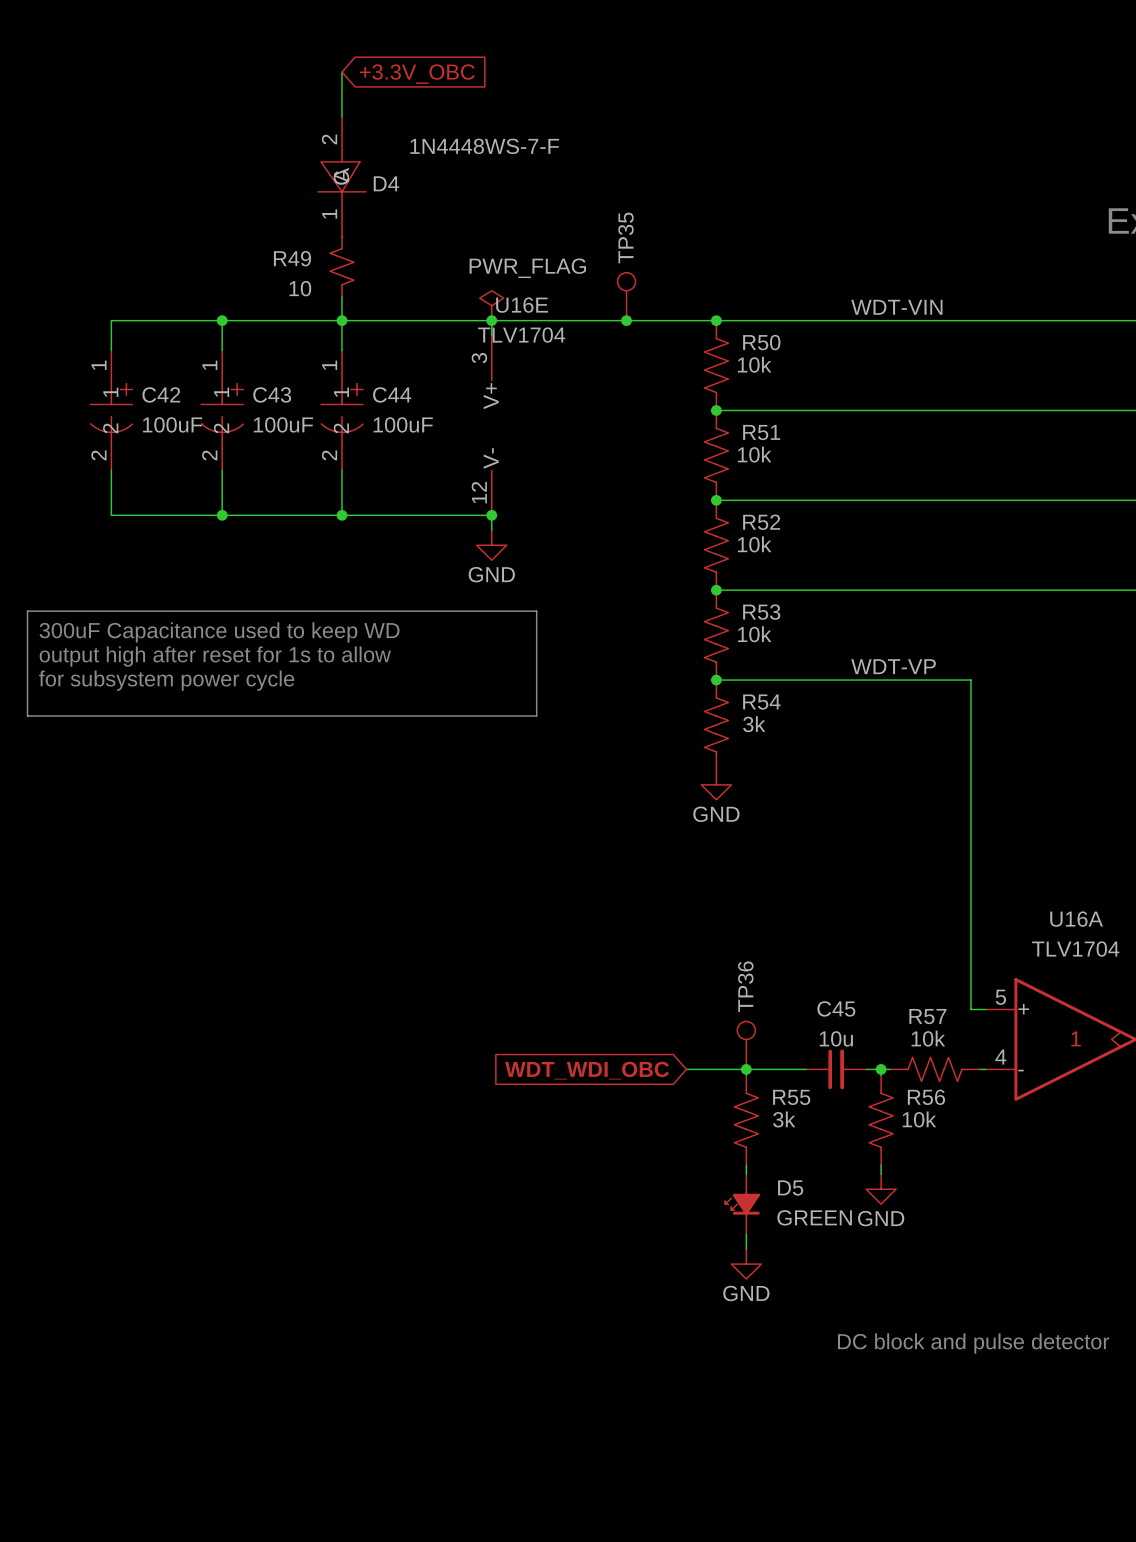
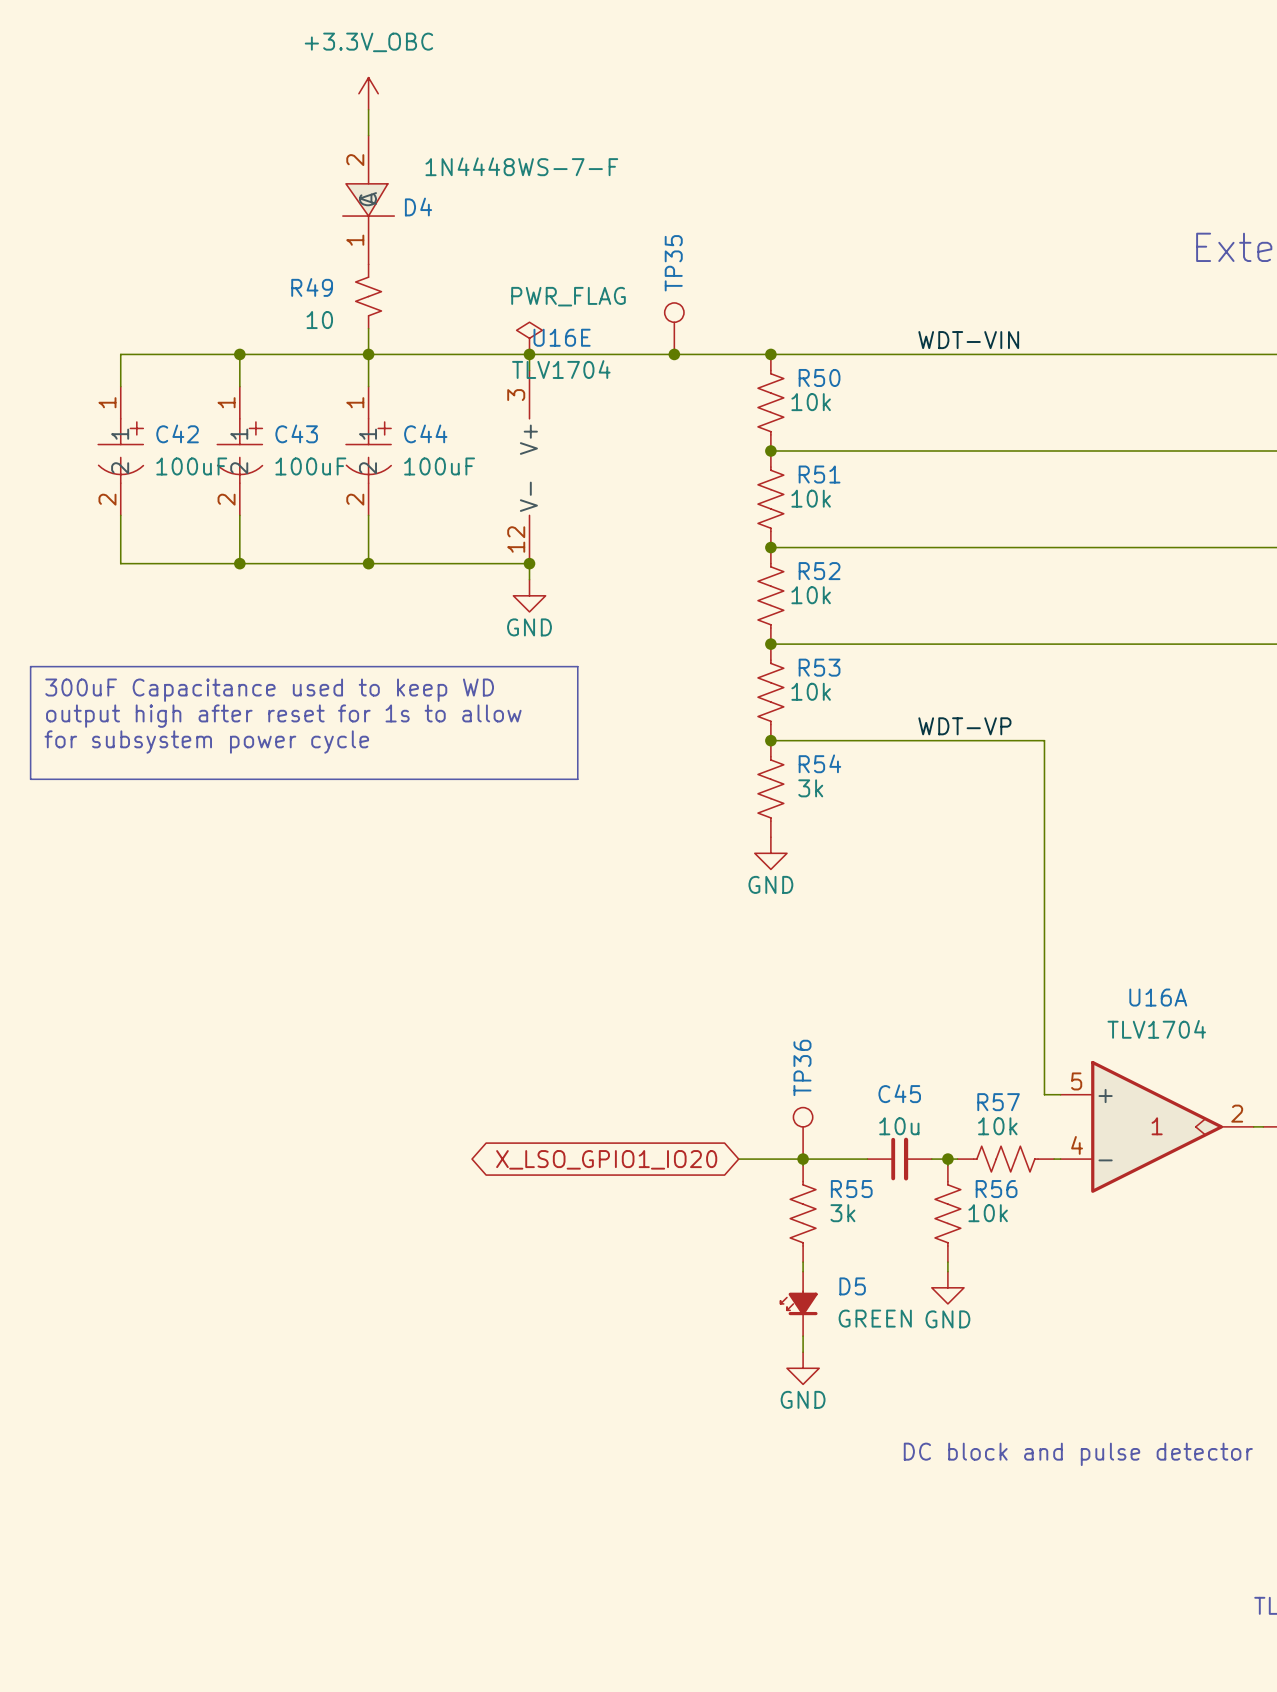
global label: +3.3V_OBC (417, 74) -> none
power symbol: none -> +3.3V_OBC (368, 93)
global label shape: input (587, 1070) -> bidirectional (606, 1159)
global label: WDT_WDI_OBC (587, 1070) -> X_LSO_GPIO1_IO20 (606, 1159)

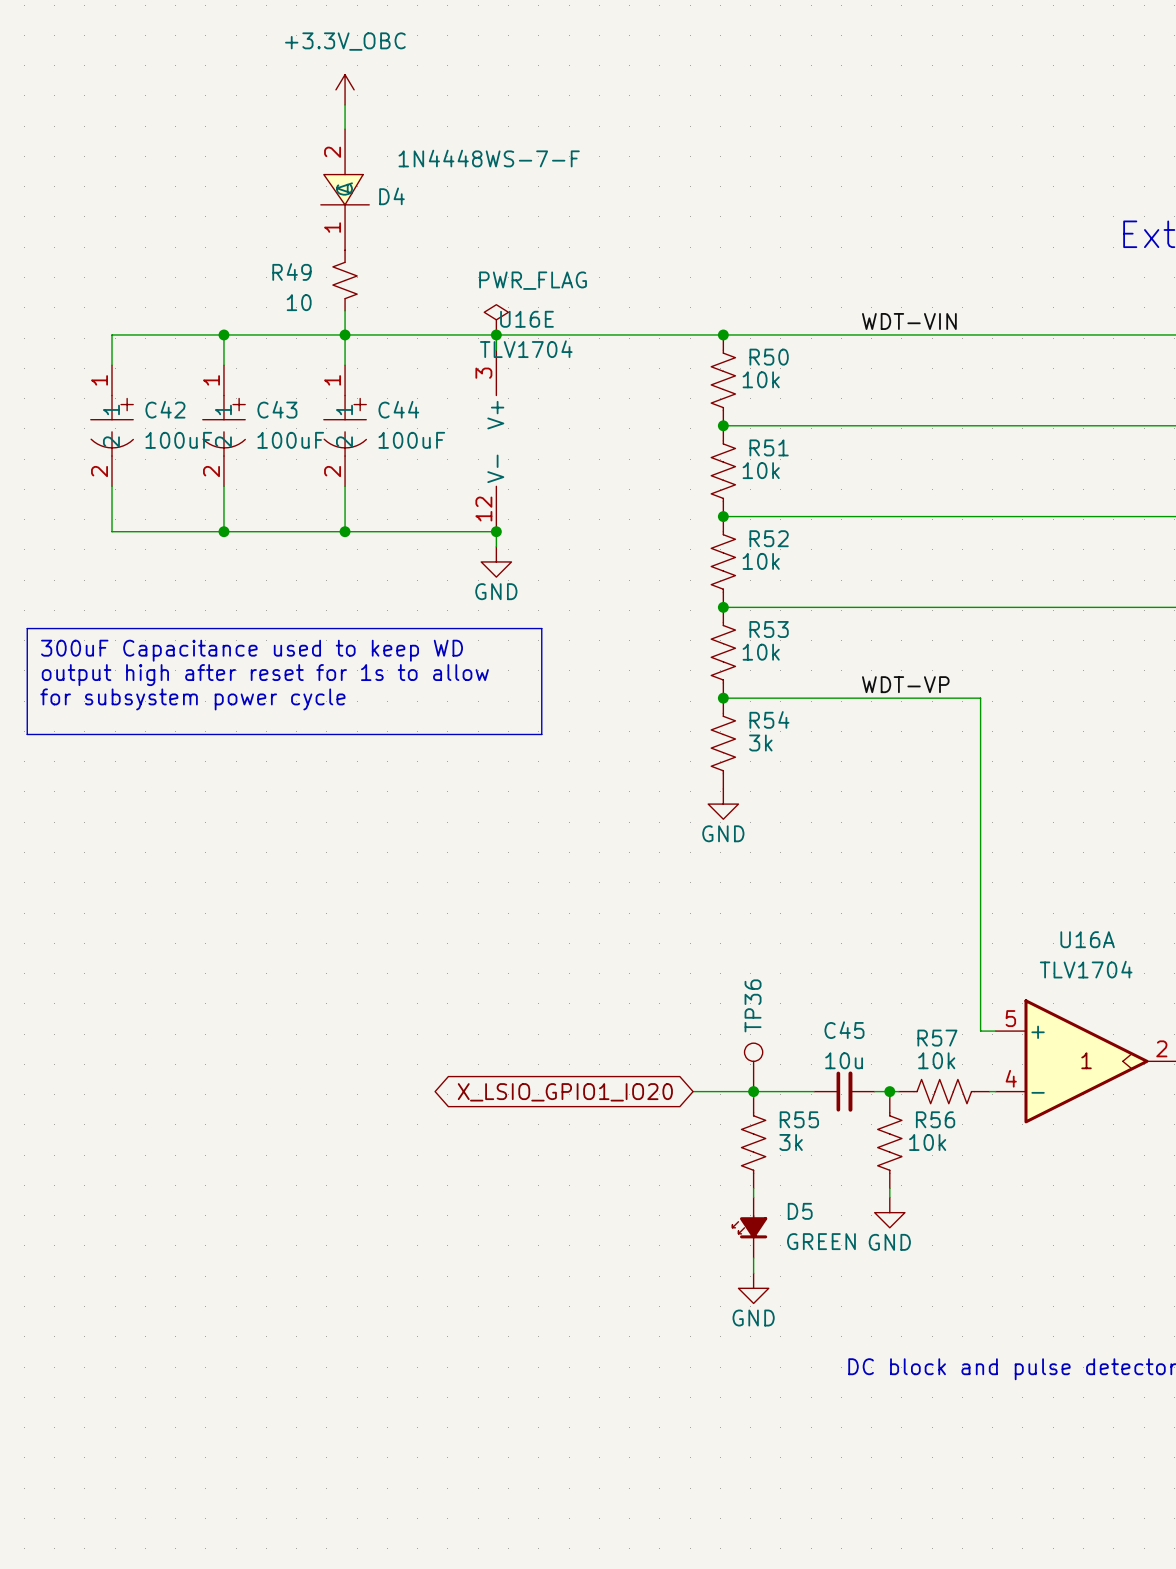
TP35: (674, 328) -> none
junction: (674, 354) -> none
global label: X_LSO_GPIO1_IO20 (606, 1159) -> X_LSIO_GPIO1_IO20 (565, 1092)

